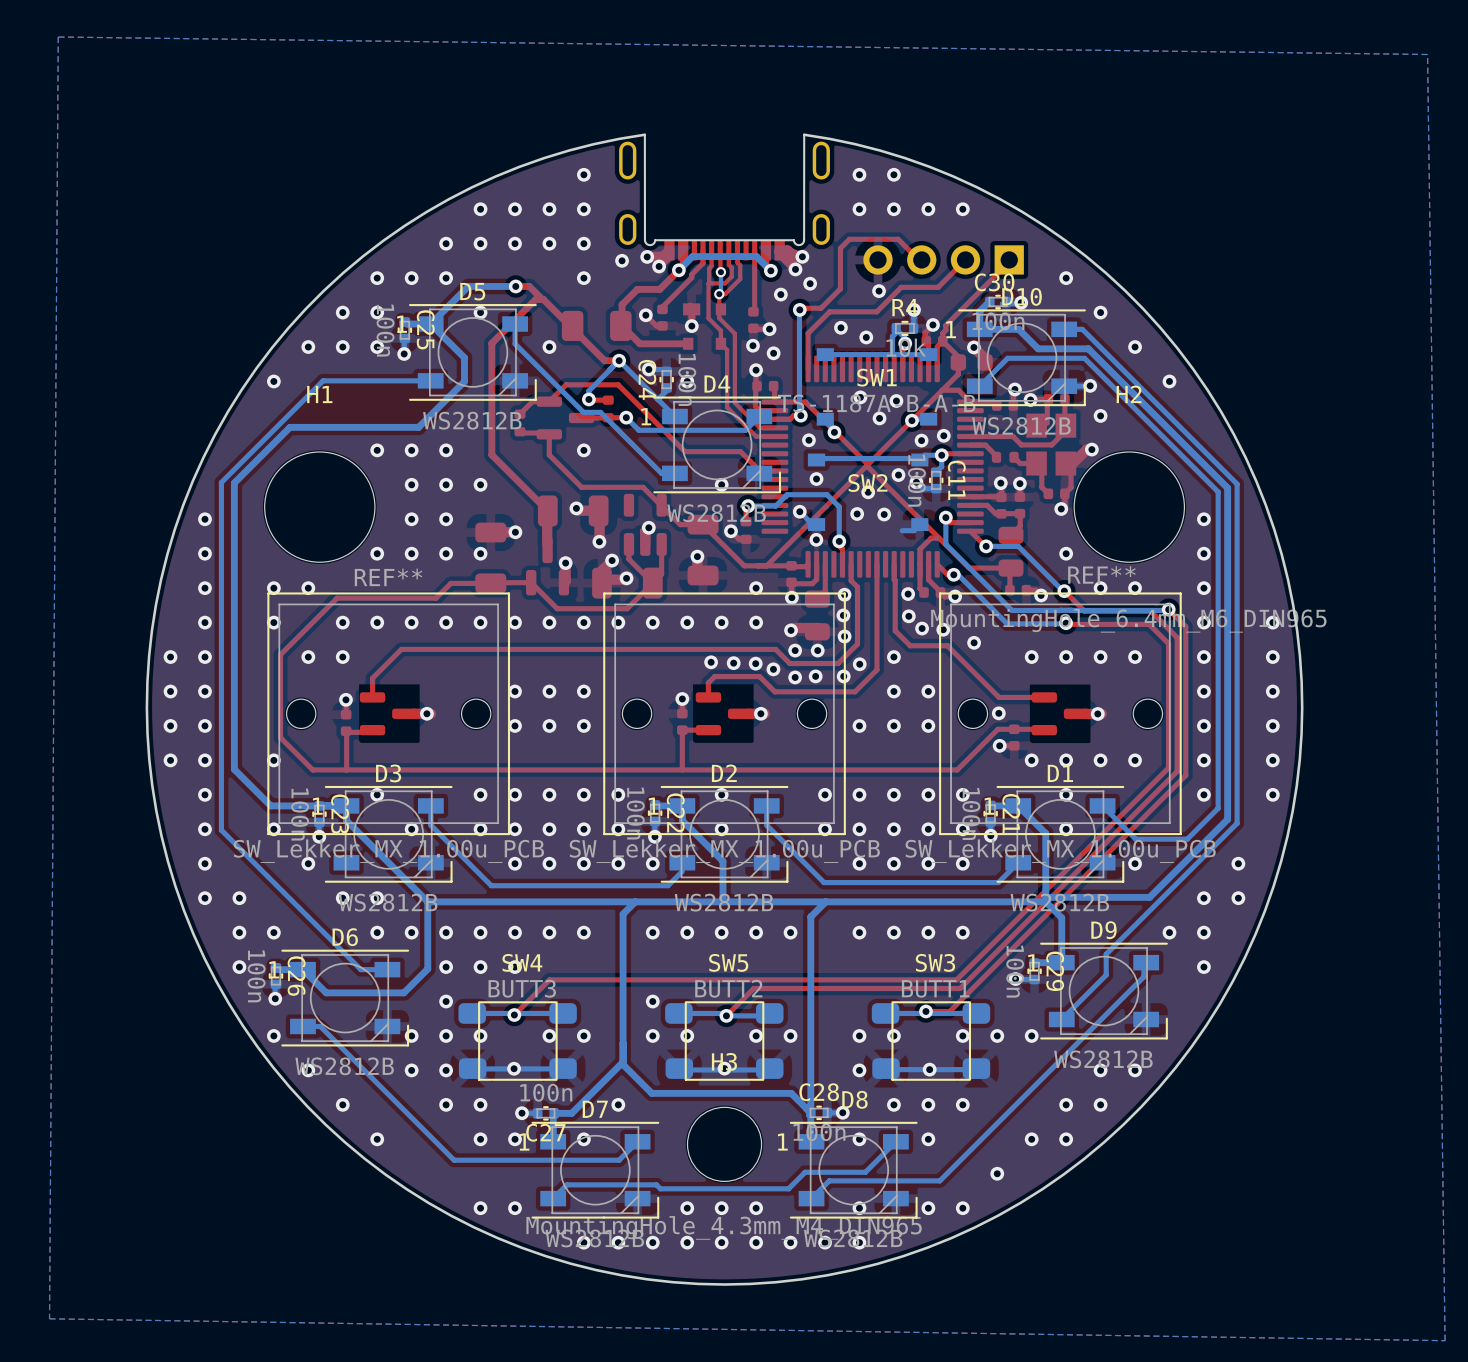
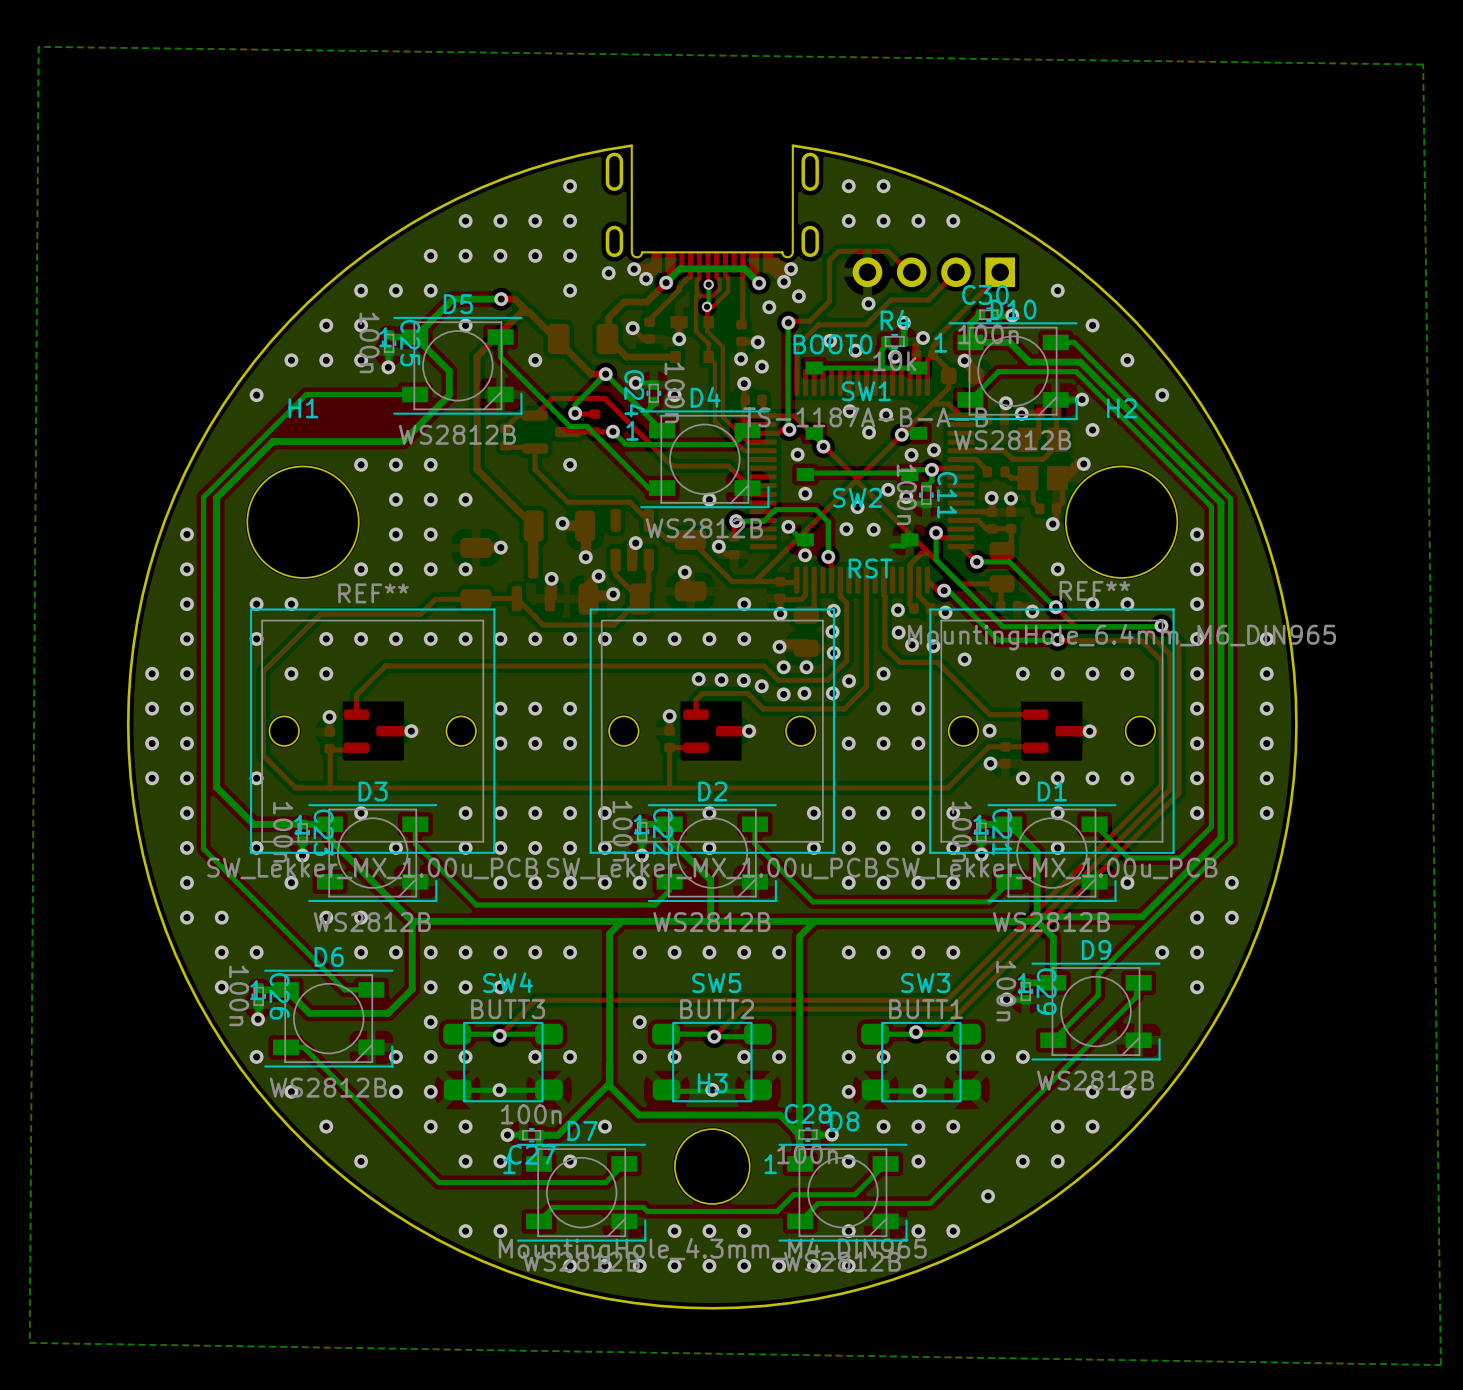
SW1 text: none -> BOOT0 (832, 344)
SW2 text: none -> RST (870, 568)

